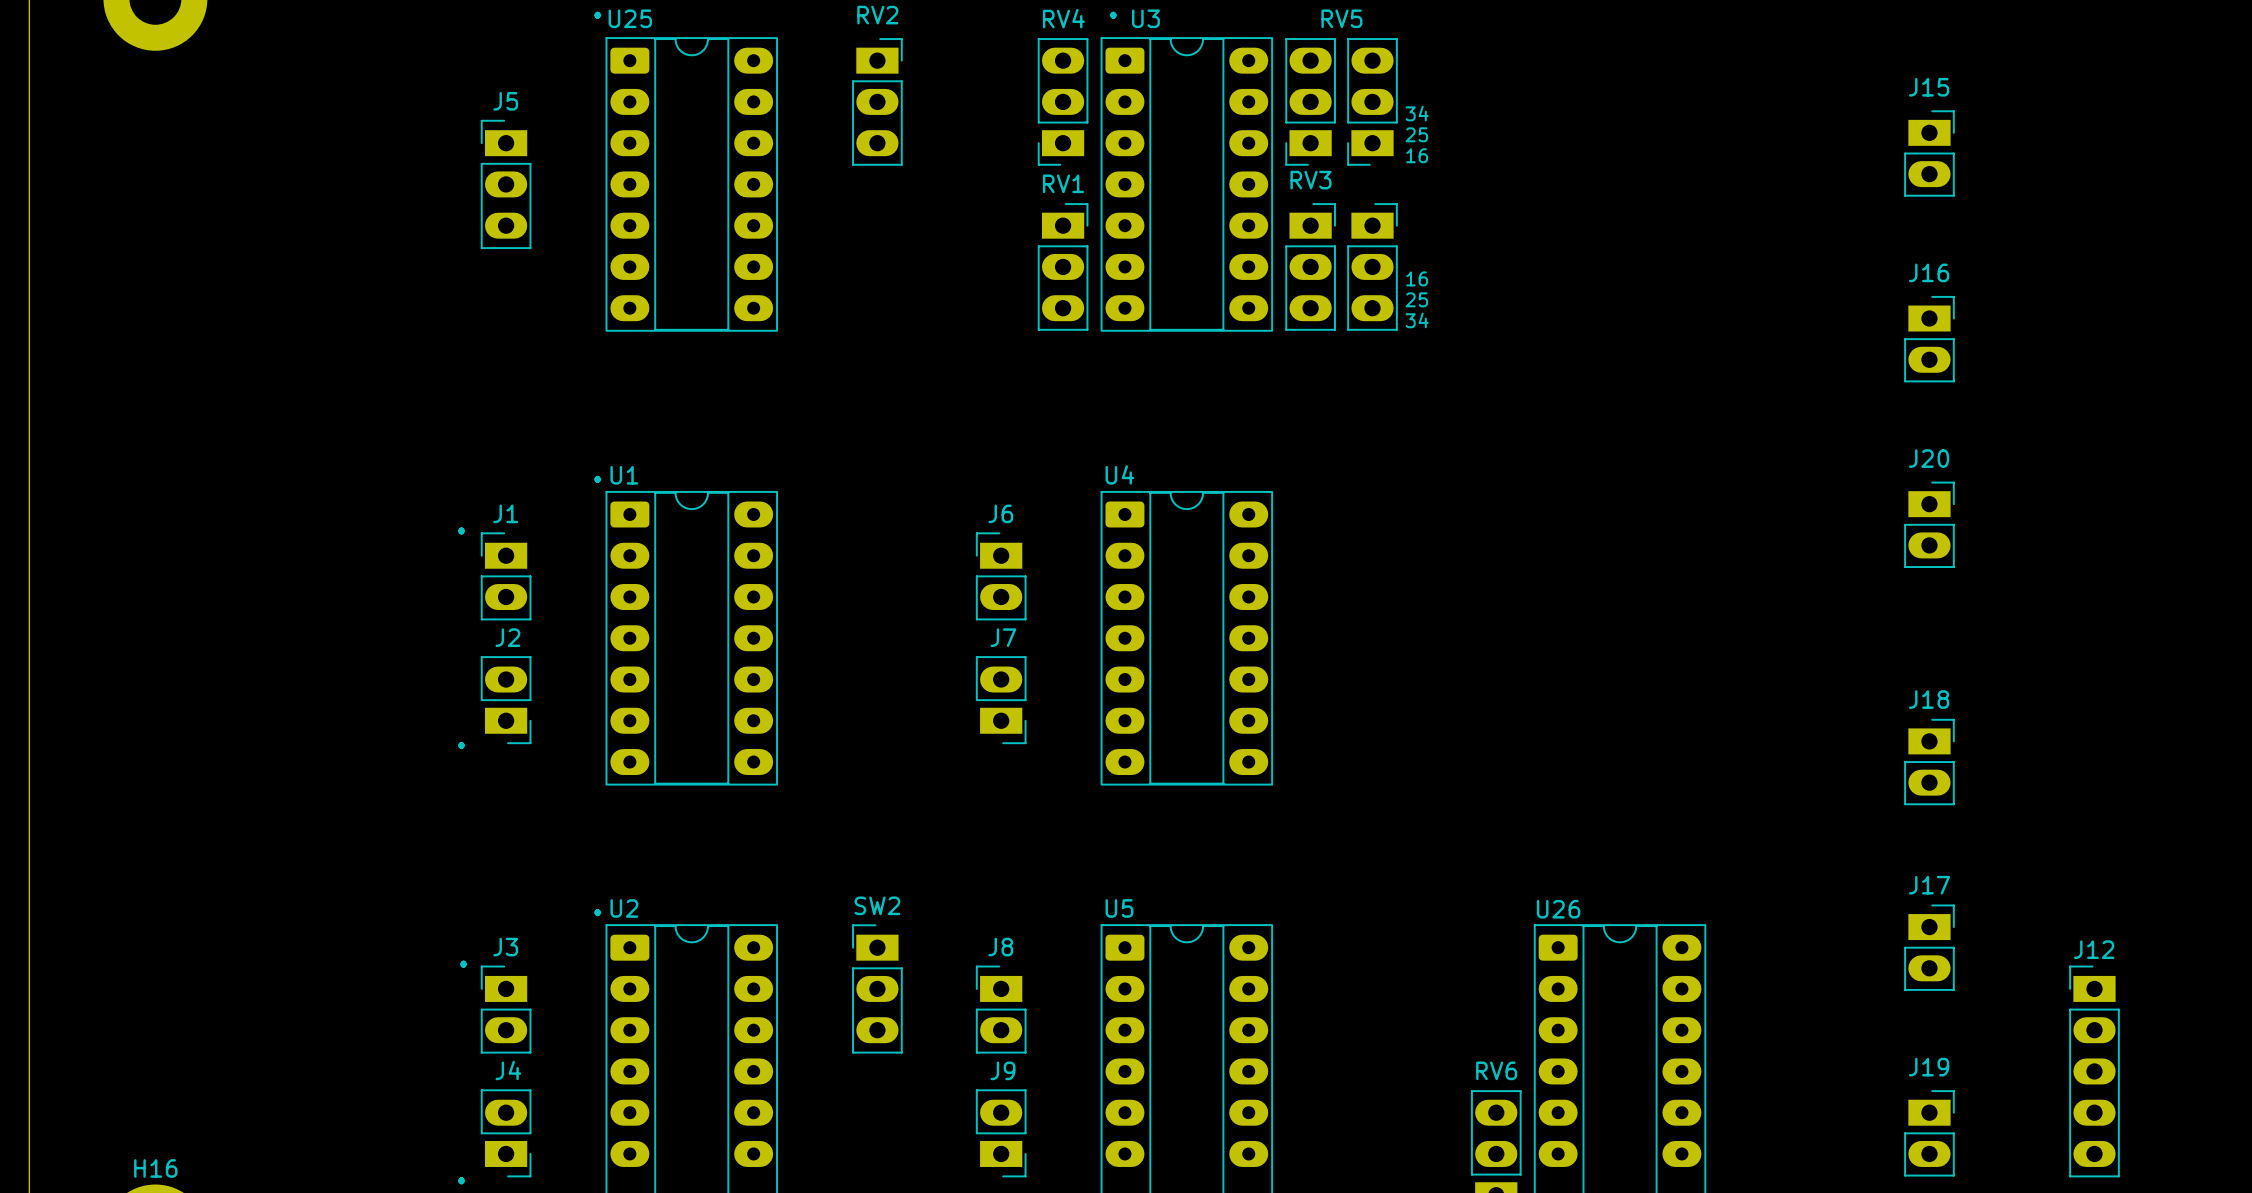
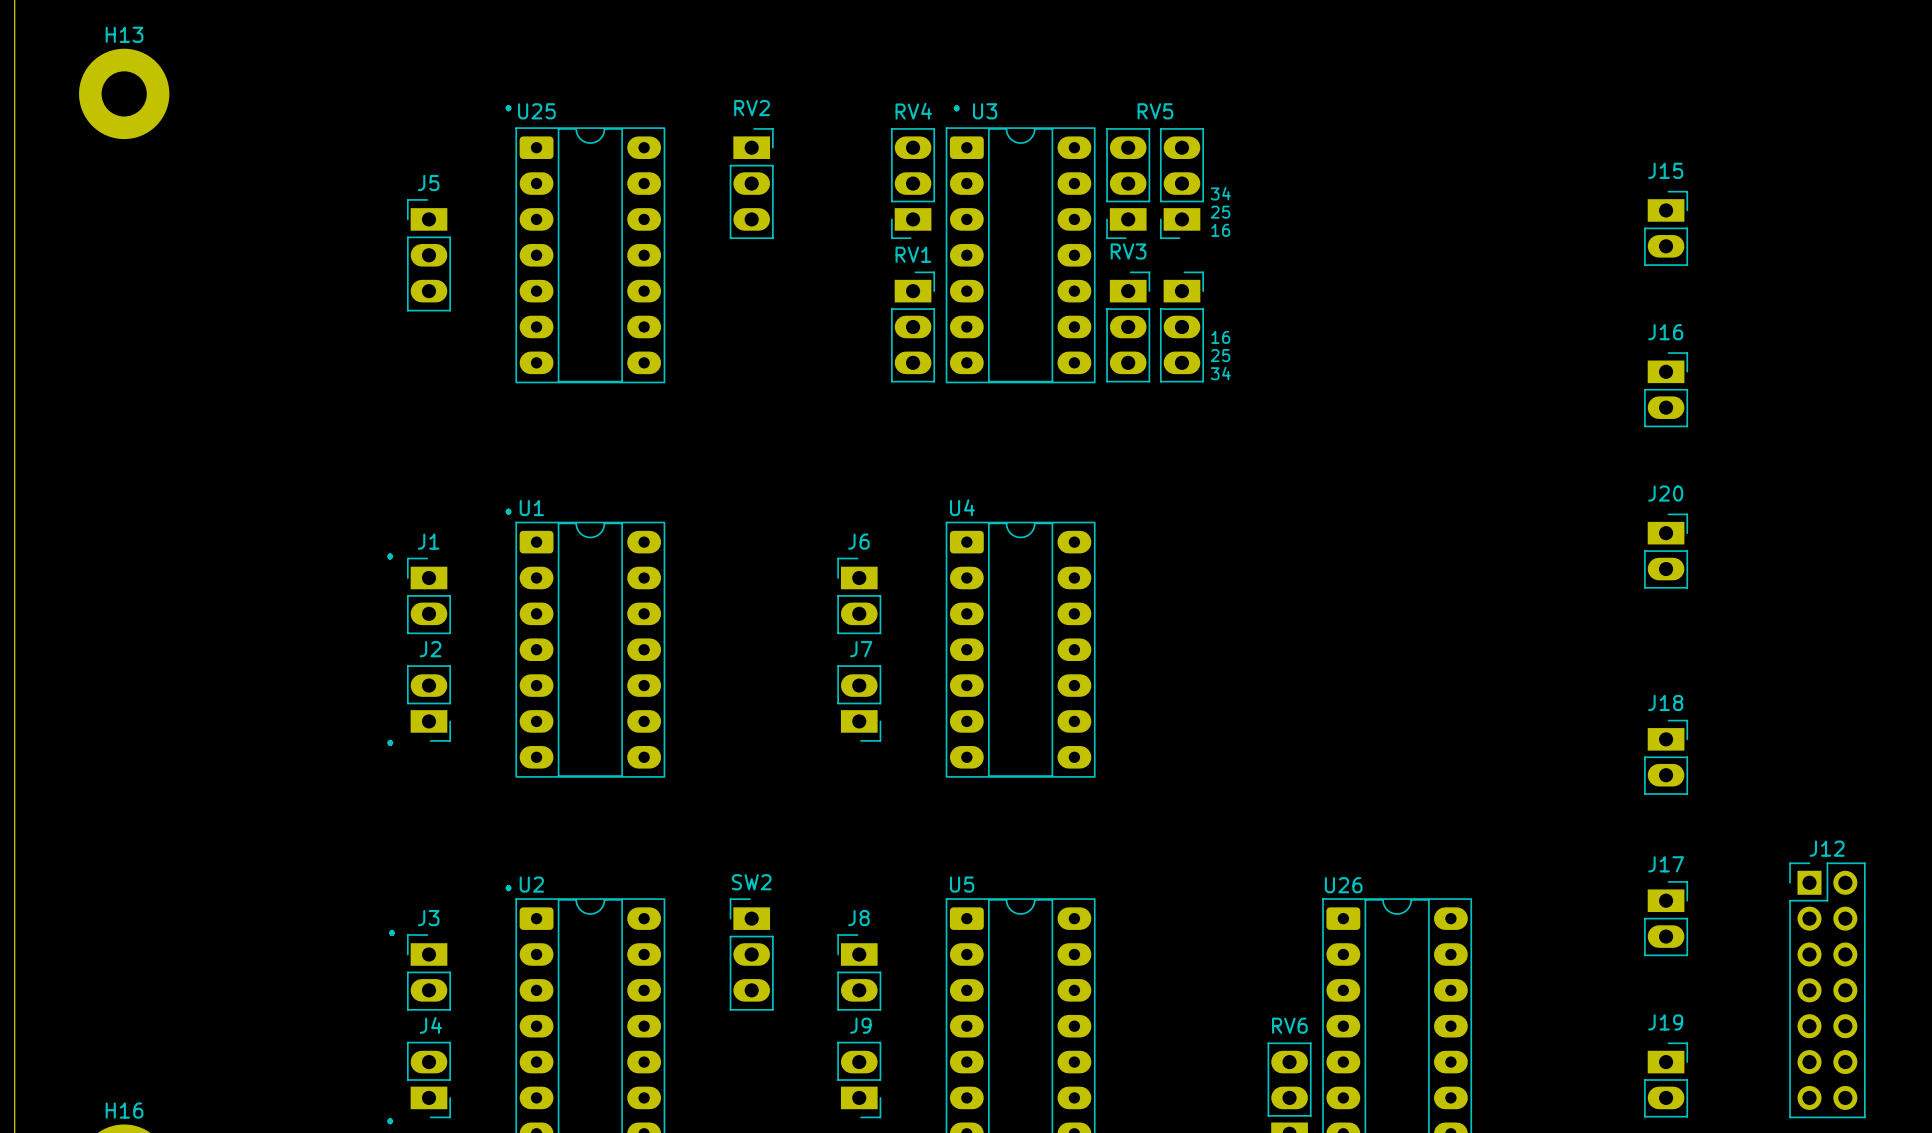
J12 name position: J12 (2094, 949) -> J12 (1827, 848)
J12 footprint: [2069, 965, 2120, 1178] -> [1789, 862, 1866, 1119]

